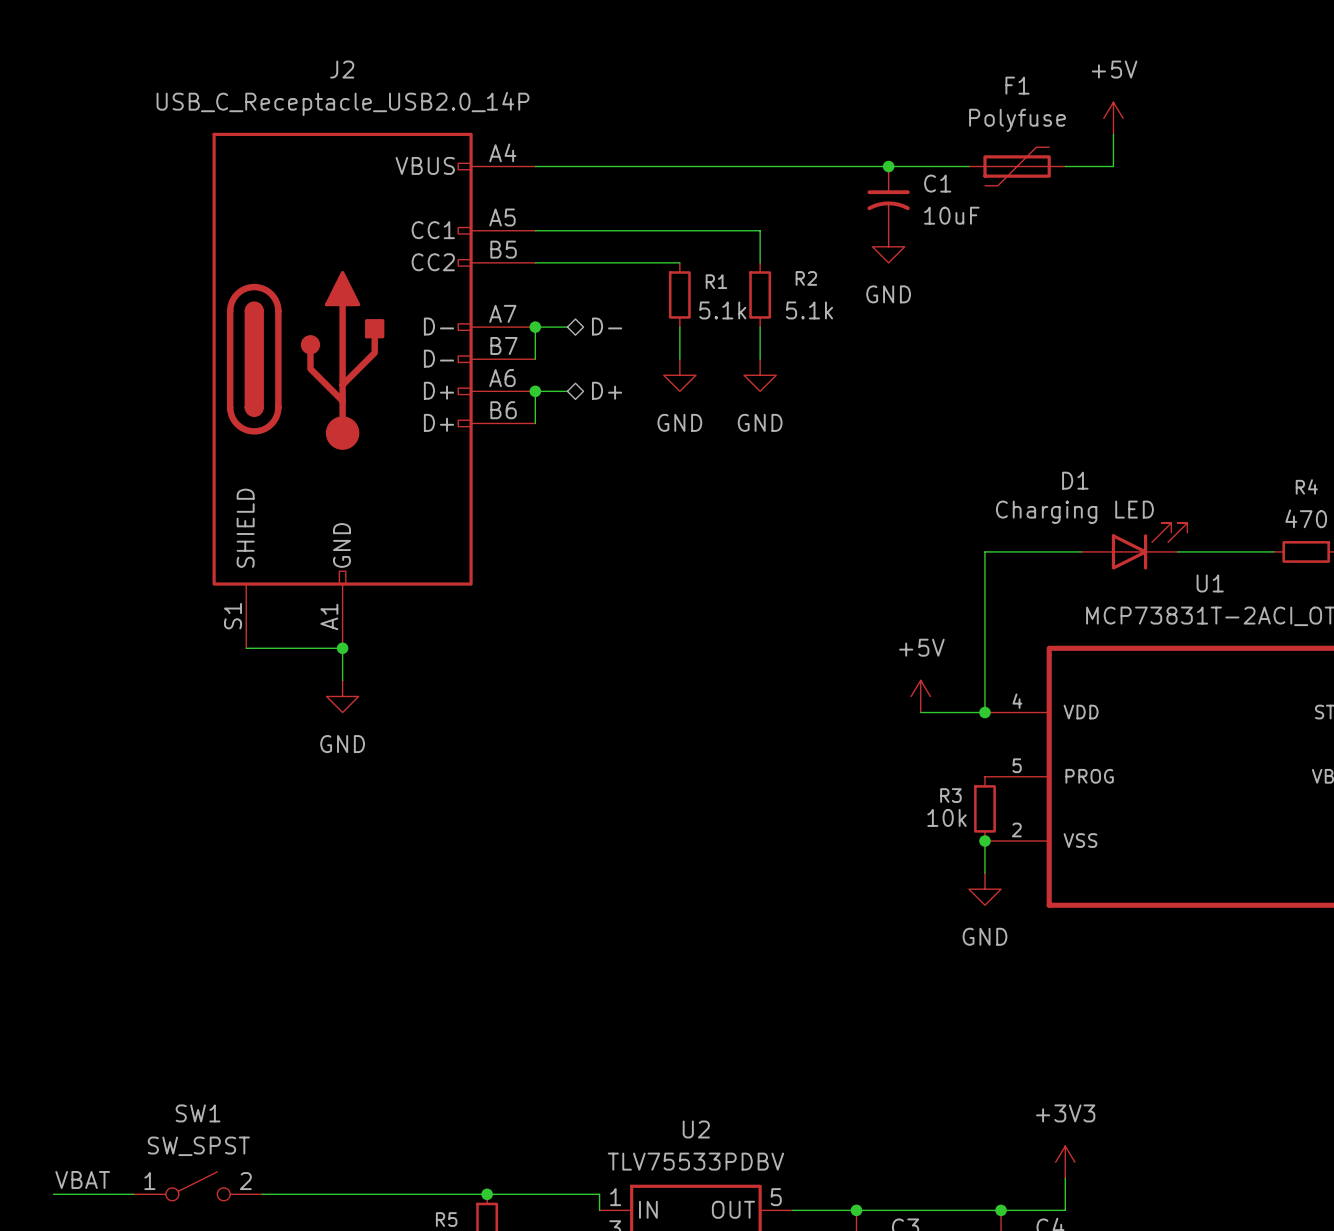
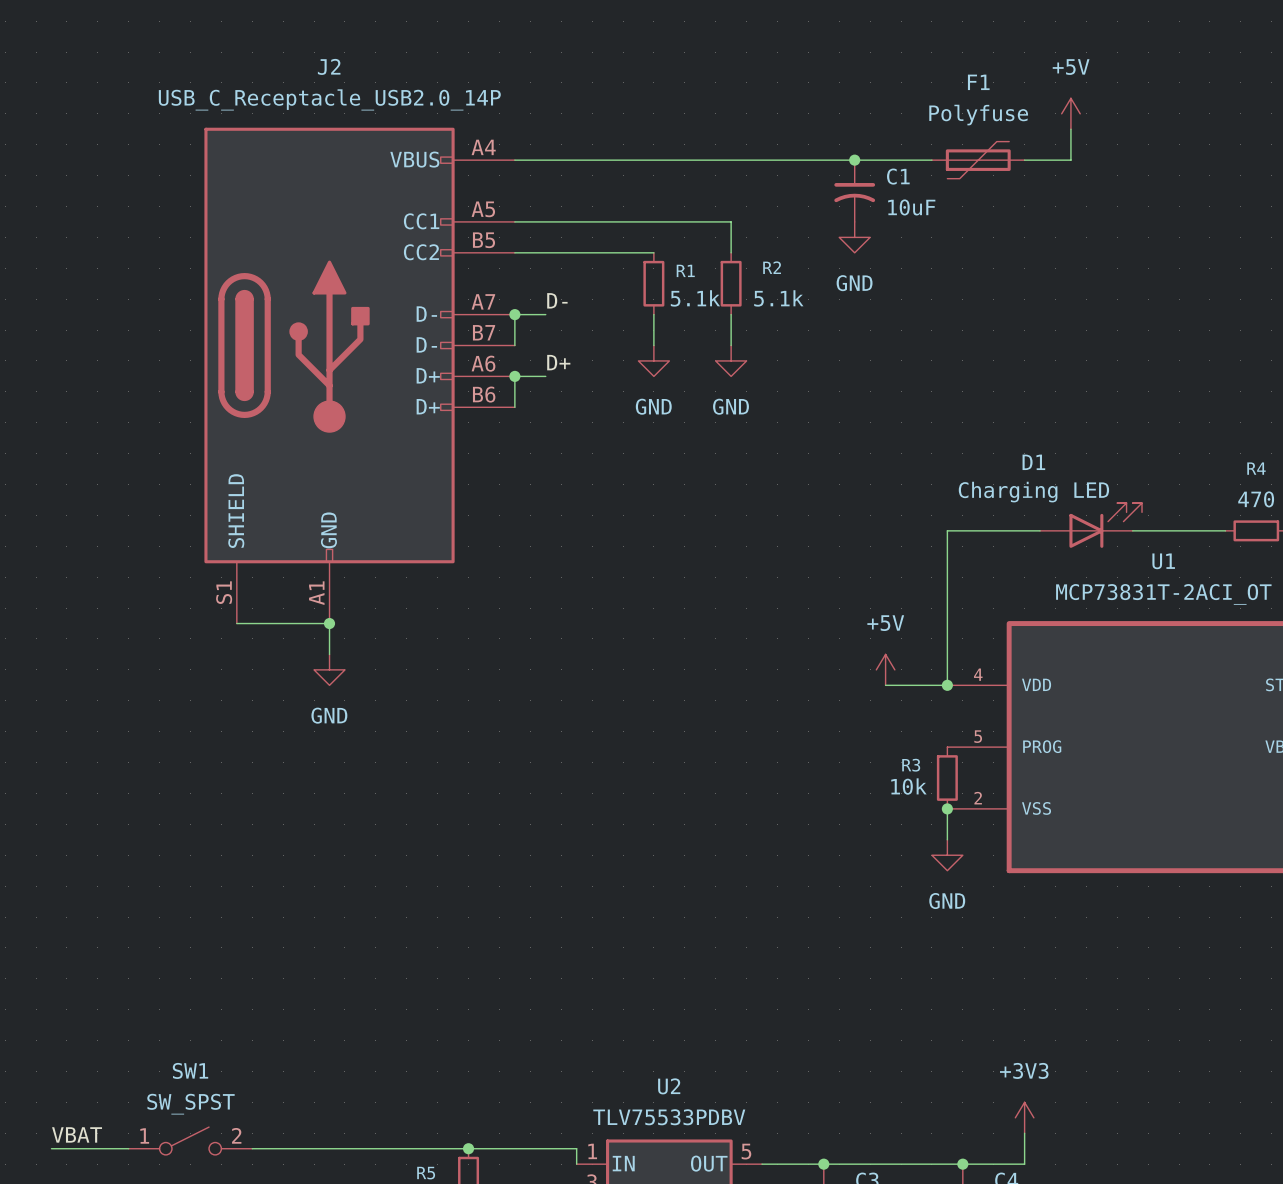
label: none -> D- (557, 300)
hierarchical label: D- (607, 326) -> none
label: none -> D+ (558, 362)
hierarchical label: D+ (607, 390) -> none

